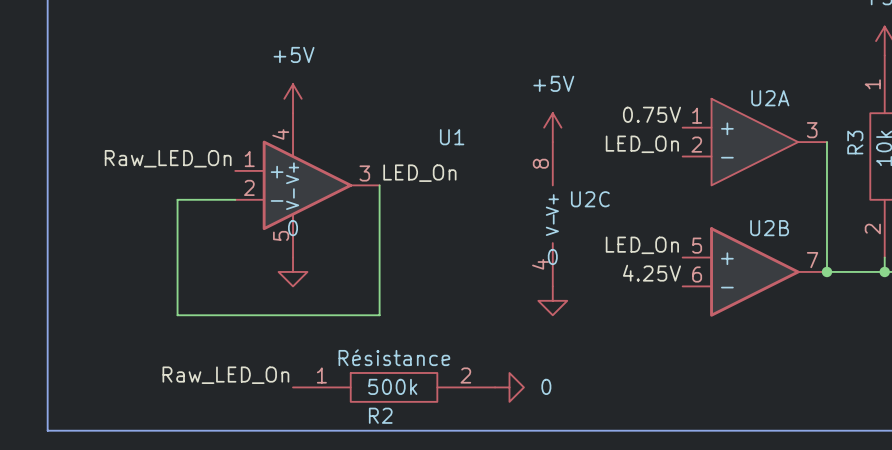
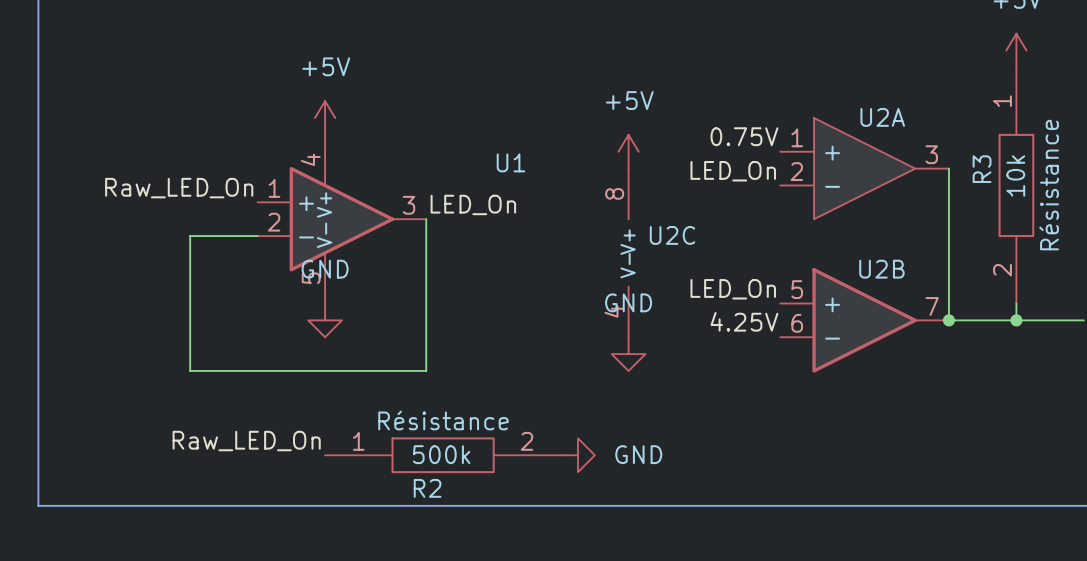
power symbol: 0 (293, 271) -> GND (325, 320)
power symbol: 0 (552, 300) -> GND (628, 354)
power symbol: 0 (509, 387) -> GND (578, 455)

